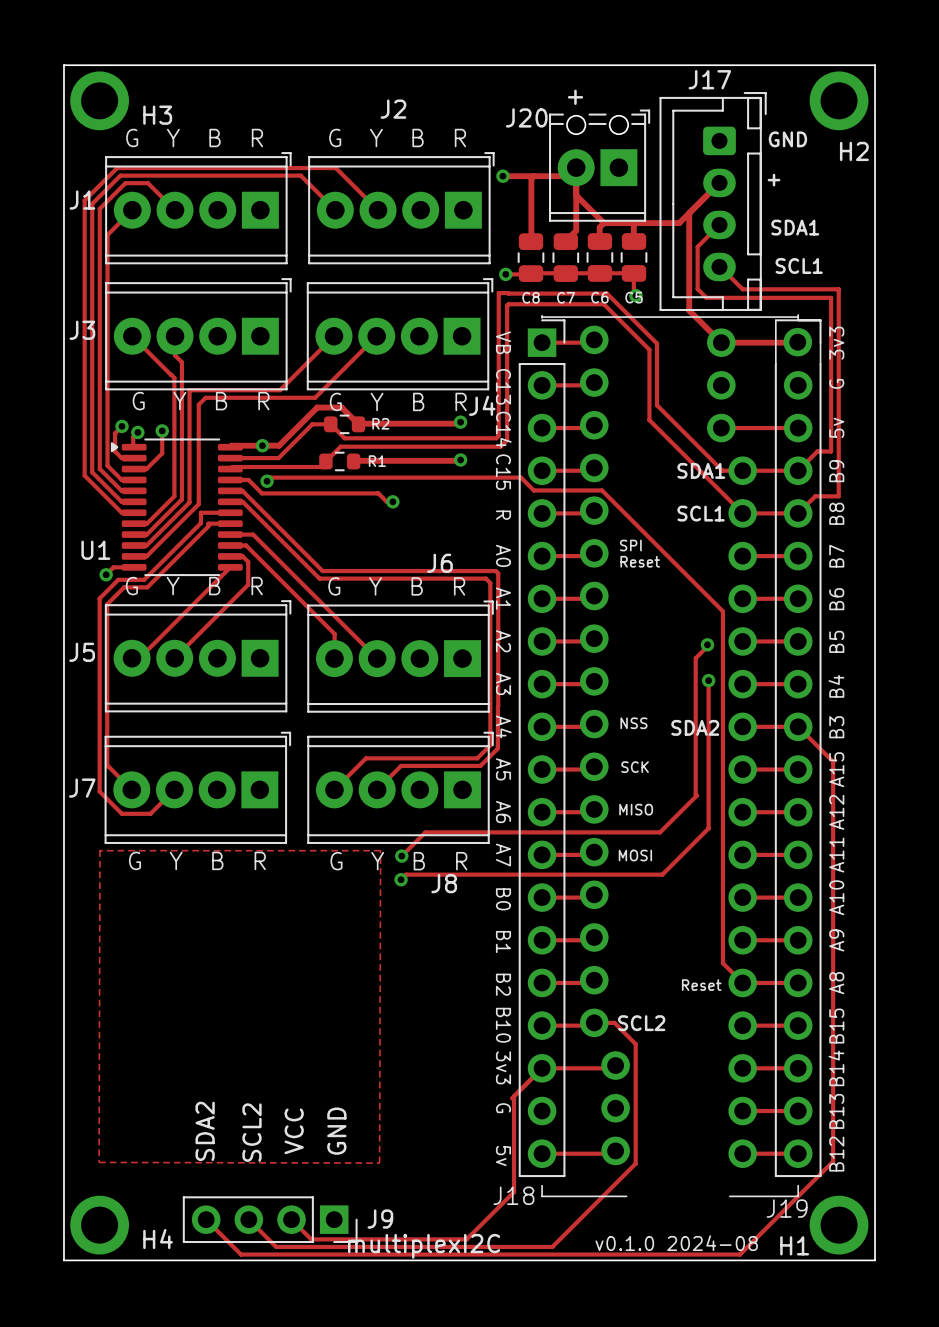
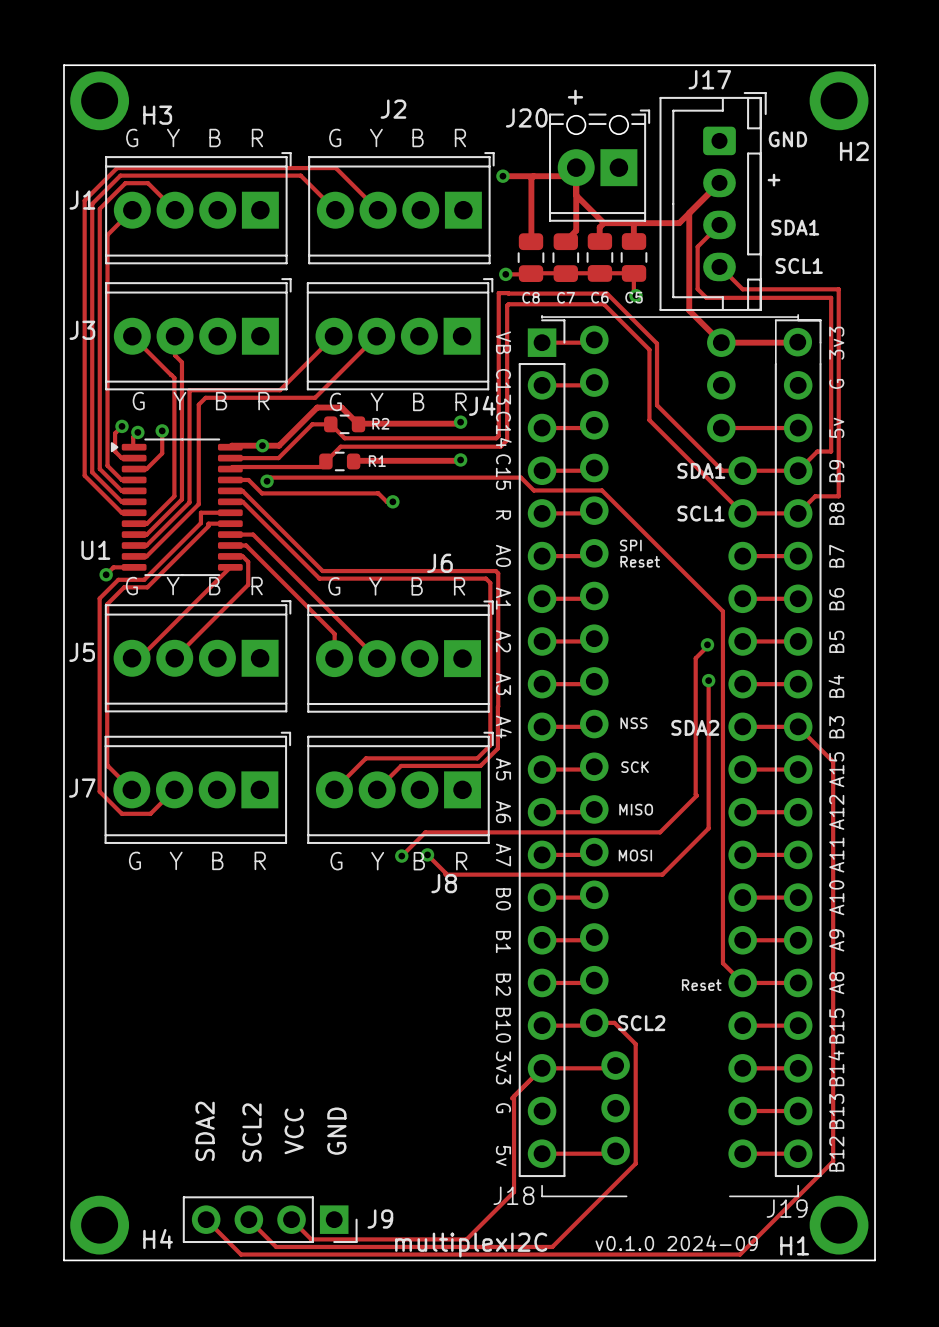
zone outline: (99, 850) (99, 1162) (379, 1163) (380, 850) (99, 850) -> none
track: (445, 874) (406, 874) (401, 879) -> (445, 874) (427, 854)
via position: (401, 879) -> (427, 854)
text: v0.1.0 2024-08 (676, 1243) -> v0.1.0 2024-09 (676, 1243)
text position: multiplexI2C (424, 1246) -> multiplexI2C (471, 1245)

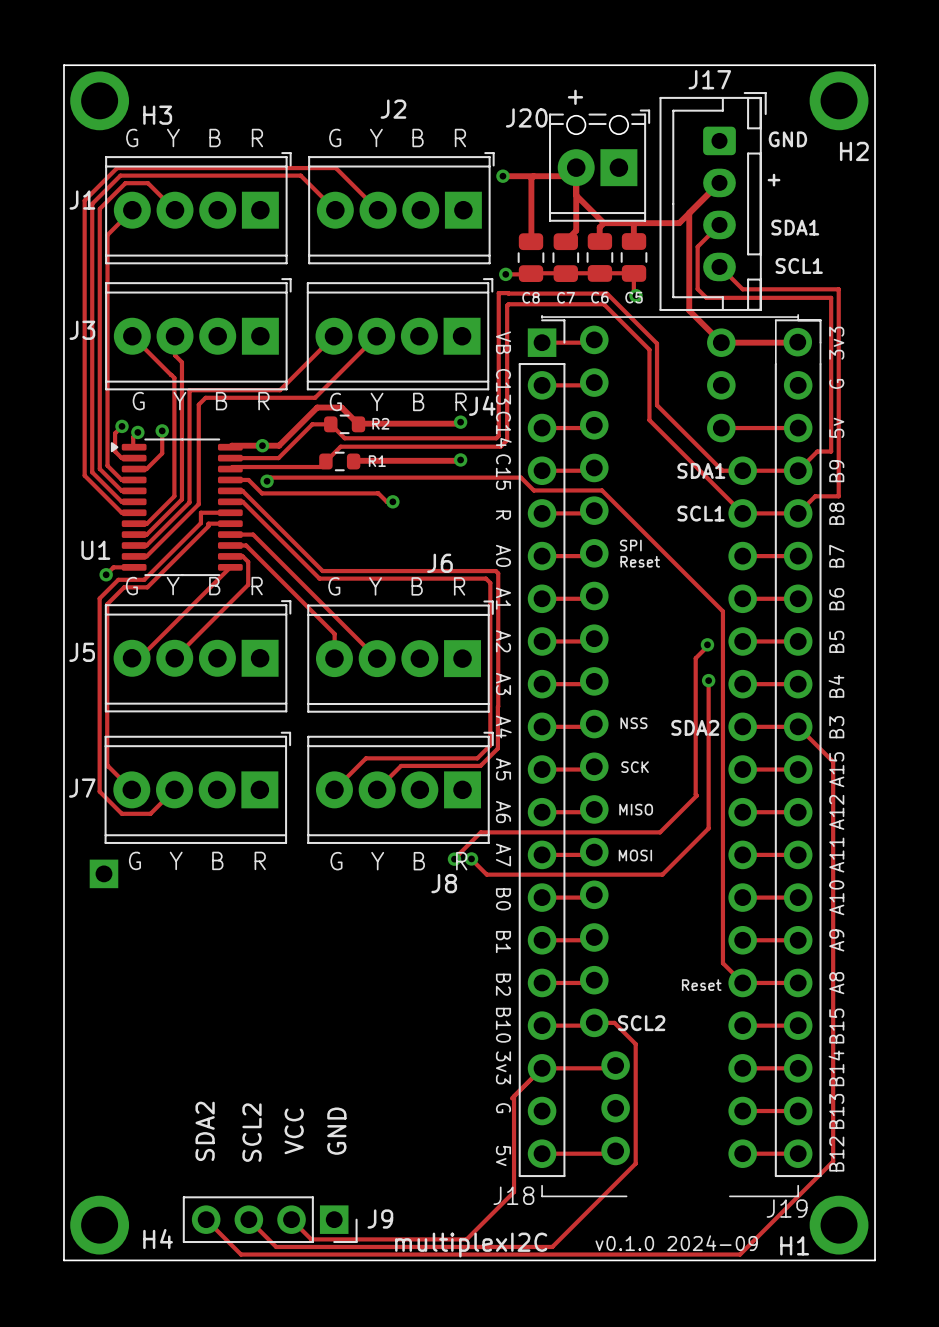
track: (480, 832) (425, 832) (401, 856) -> (480, 832) (454, 859)
track: (427, 854) (445, 874) (486, 874) -> (471, 858) (486, 874)
via: (427, 854) -> none
via: (401, 856) -> none
via: none -> (471, 858)
via: none -> (454, 859)
part: none -> (103, 873)

